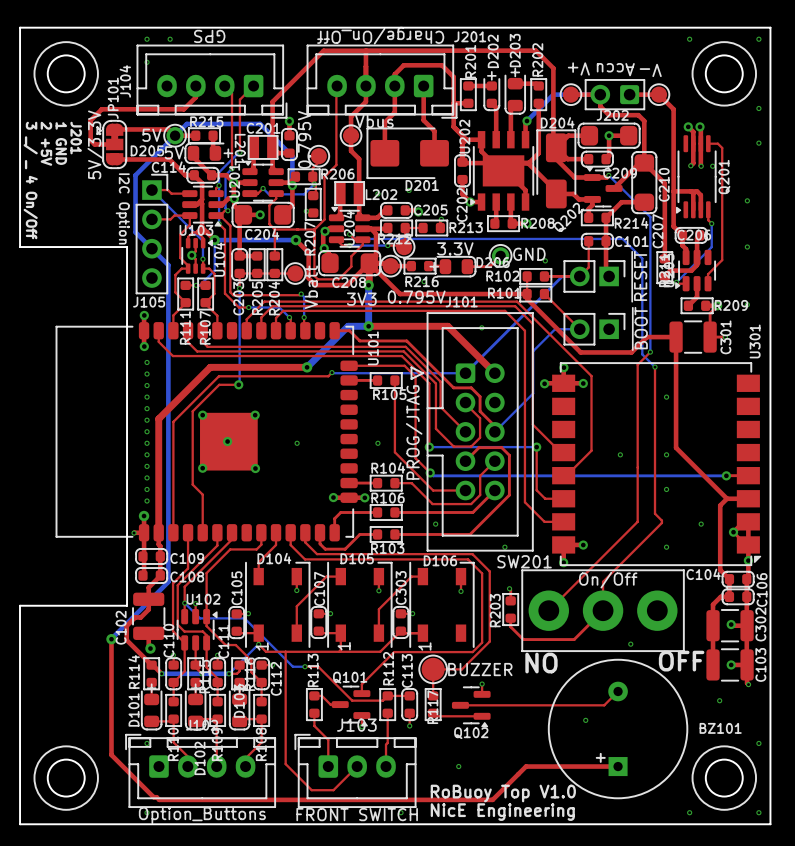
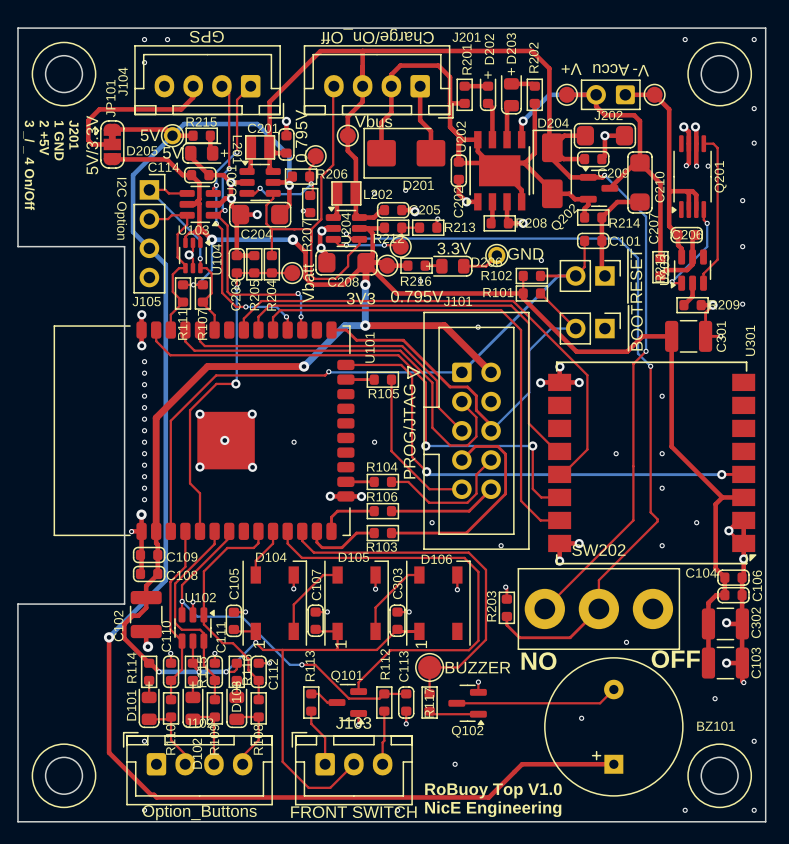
SW201 name: SW201 (524, 561) -> SW202 (598, 550)
SW201 value: On/Off (608, 580) -> none

